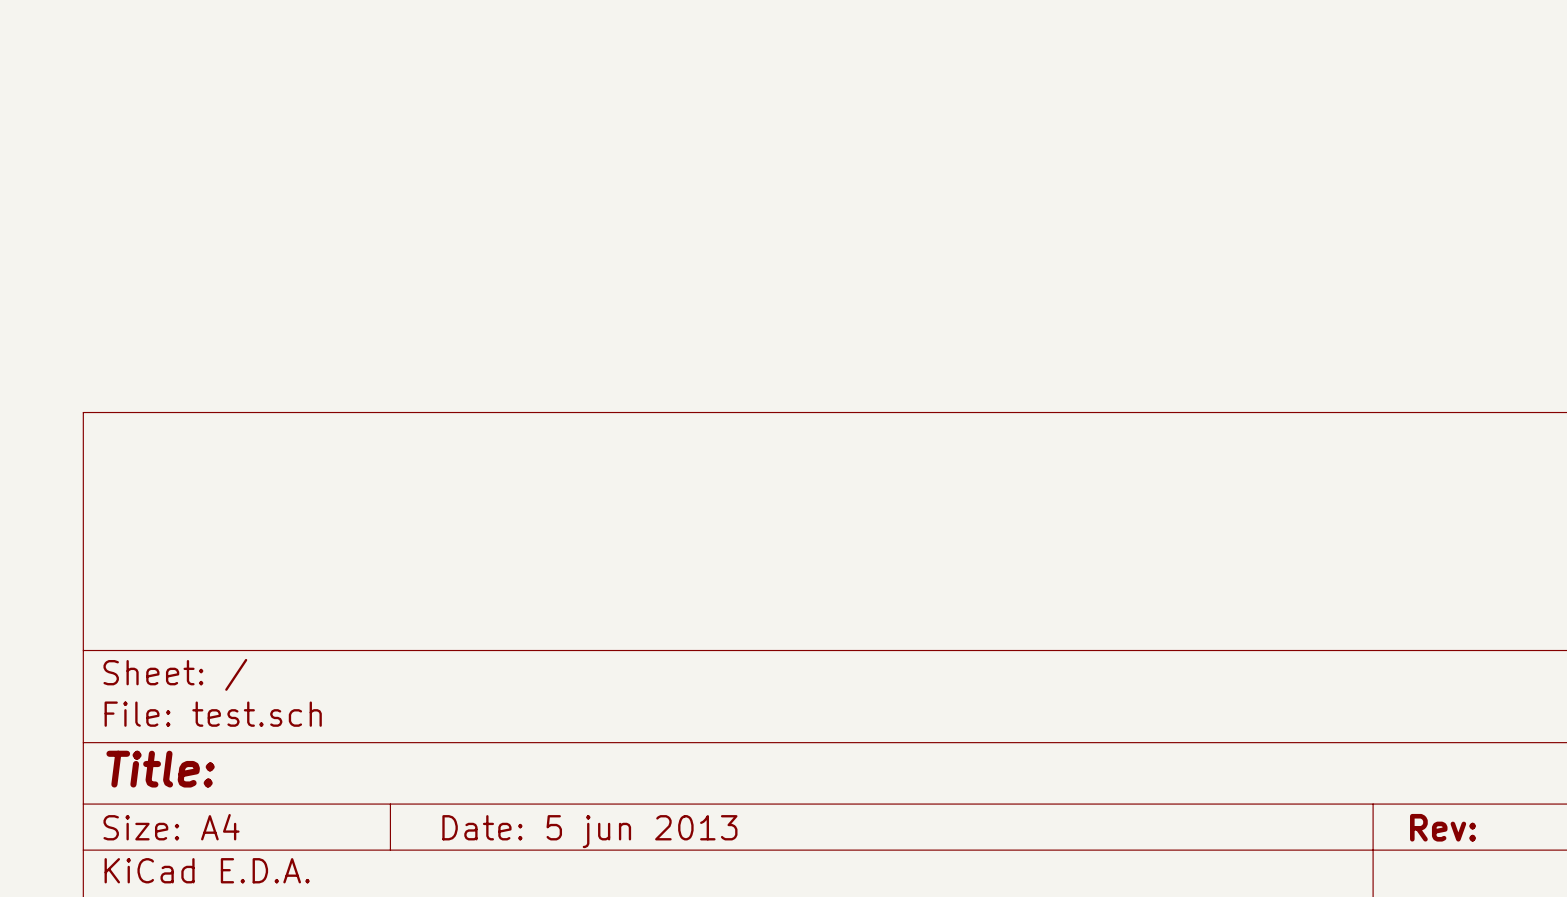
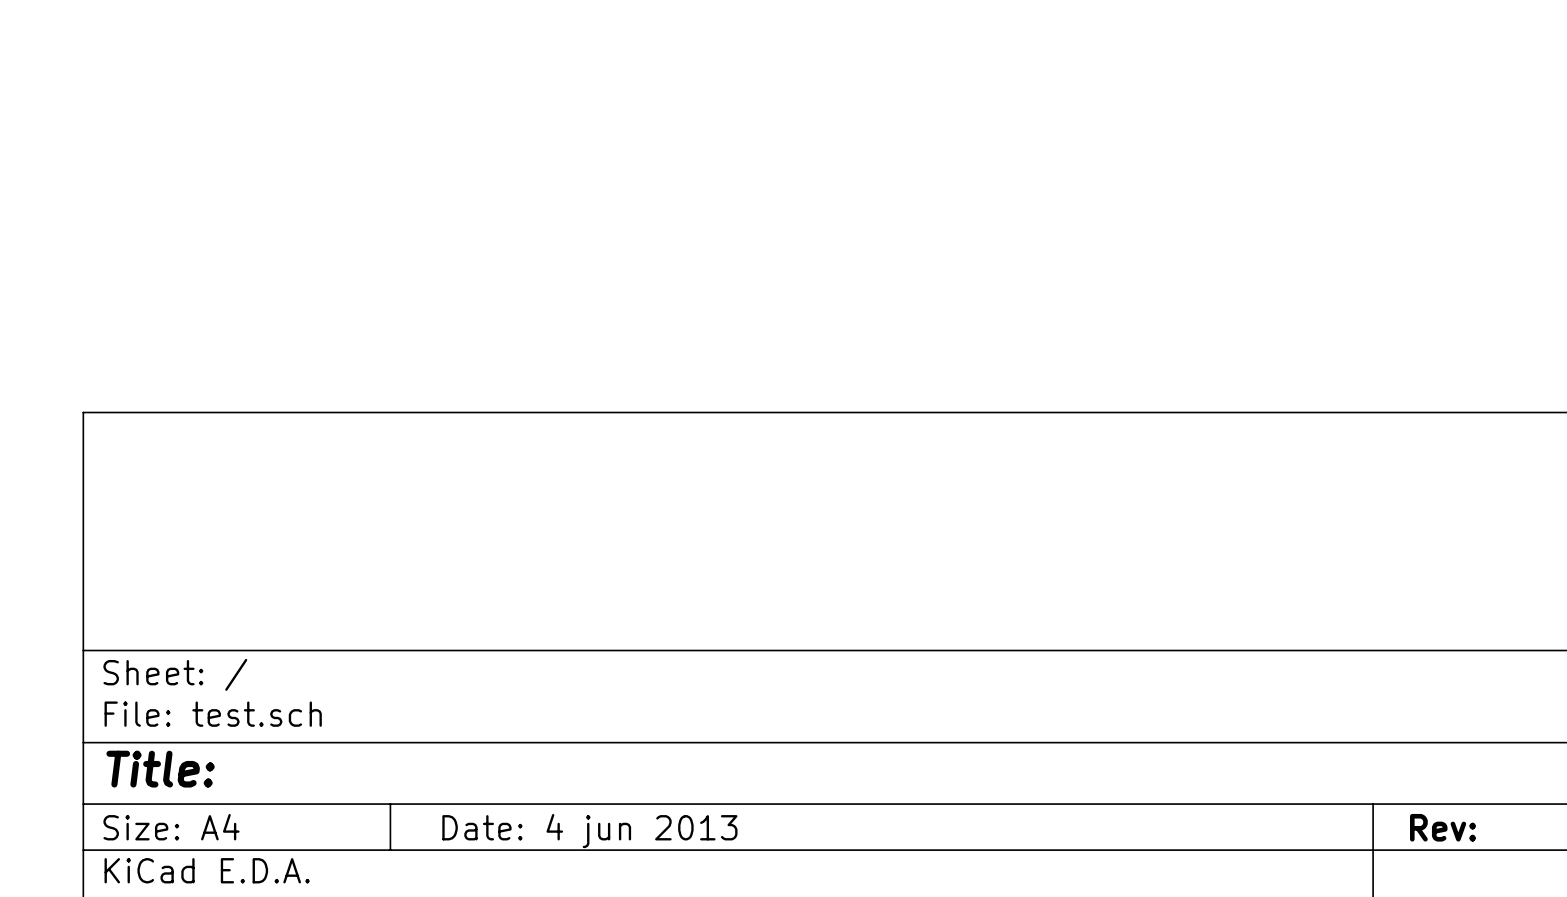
title block: Date: 5 jun 2013 (589, 831) -> Date: 4 jun 2013 (589, 831)

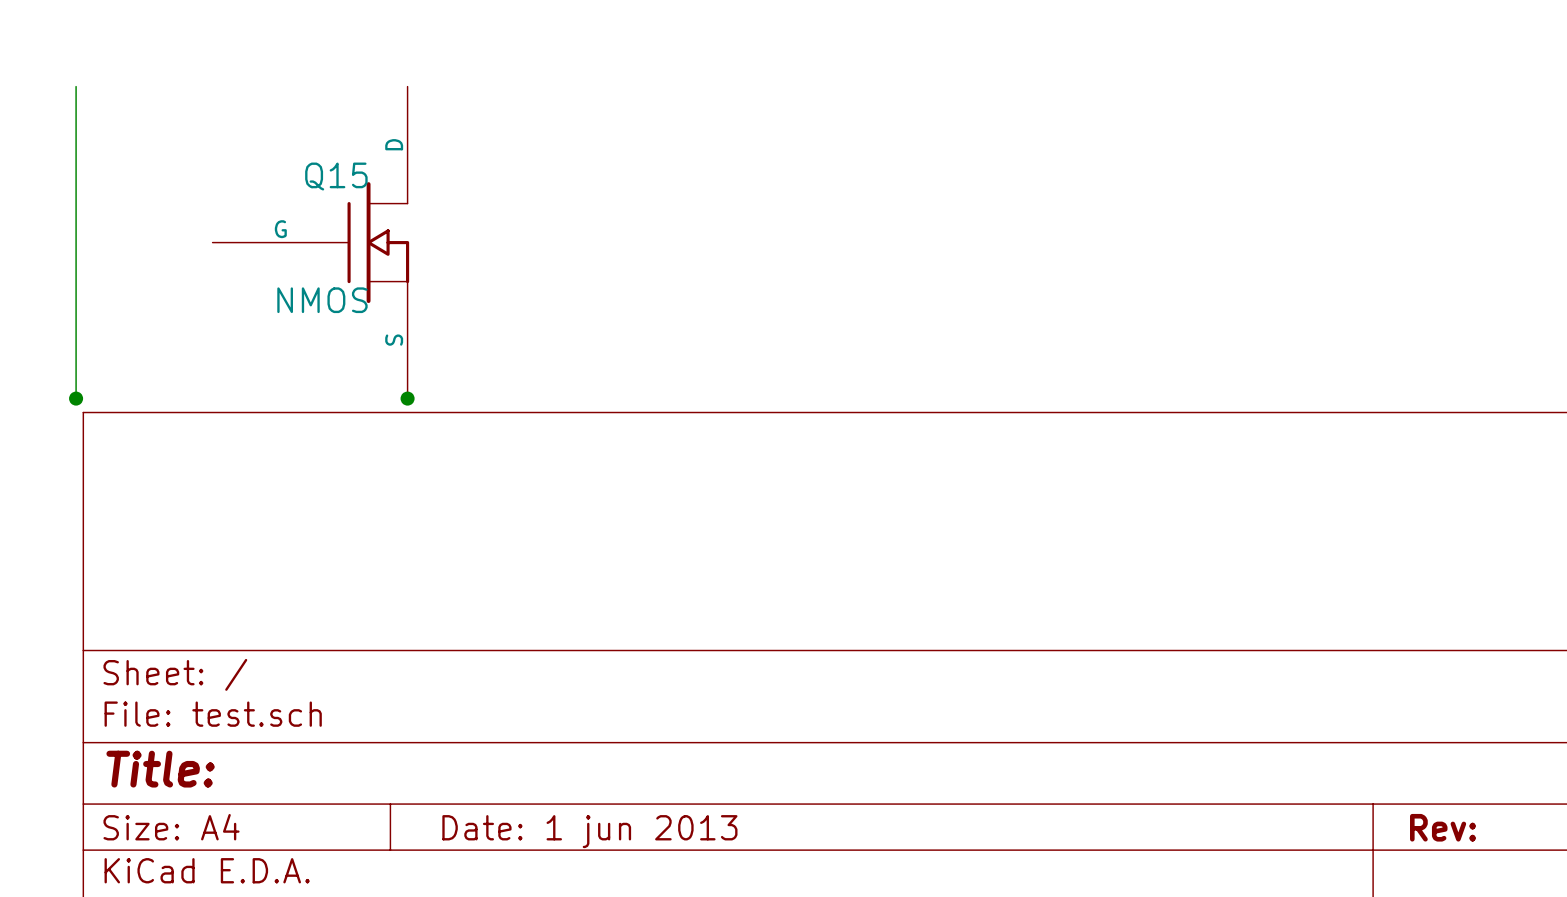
wire: none -> (76, 86) (76, 398)
Q15: none -> NMOS (310, 242)
junction: none -> (76, 398)
junction: none -> (407, 398)
title block: Date: 4 jun 2013 (589, 831) -> Date: 1 jun 2013 (589, 831)

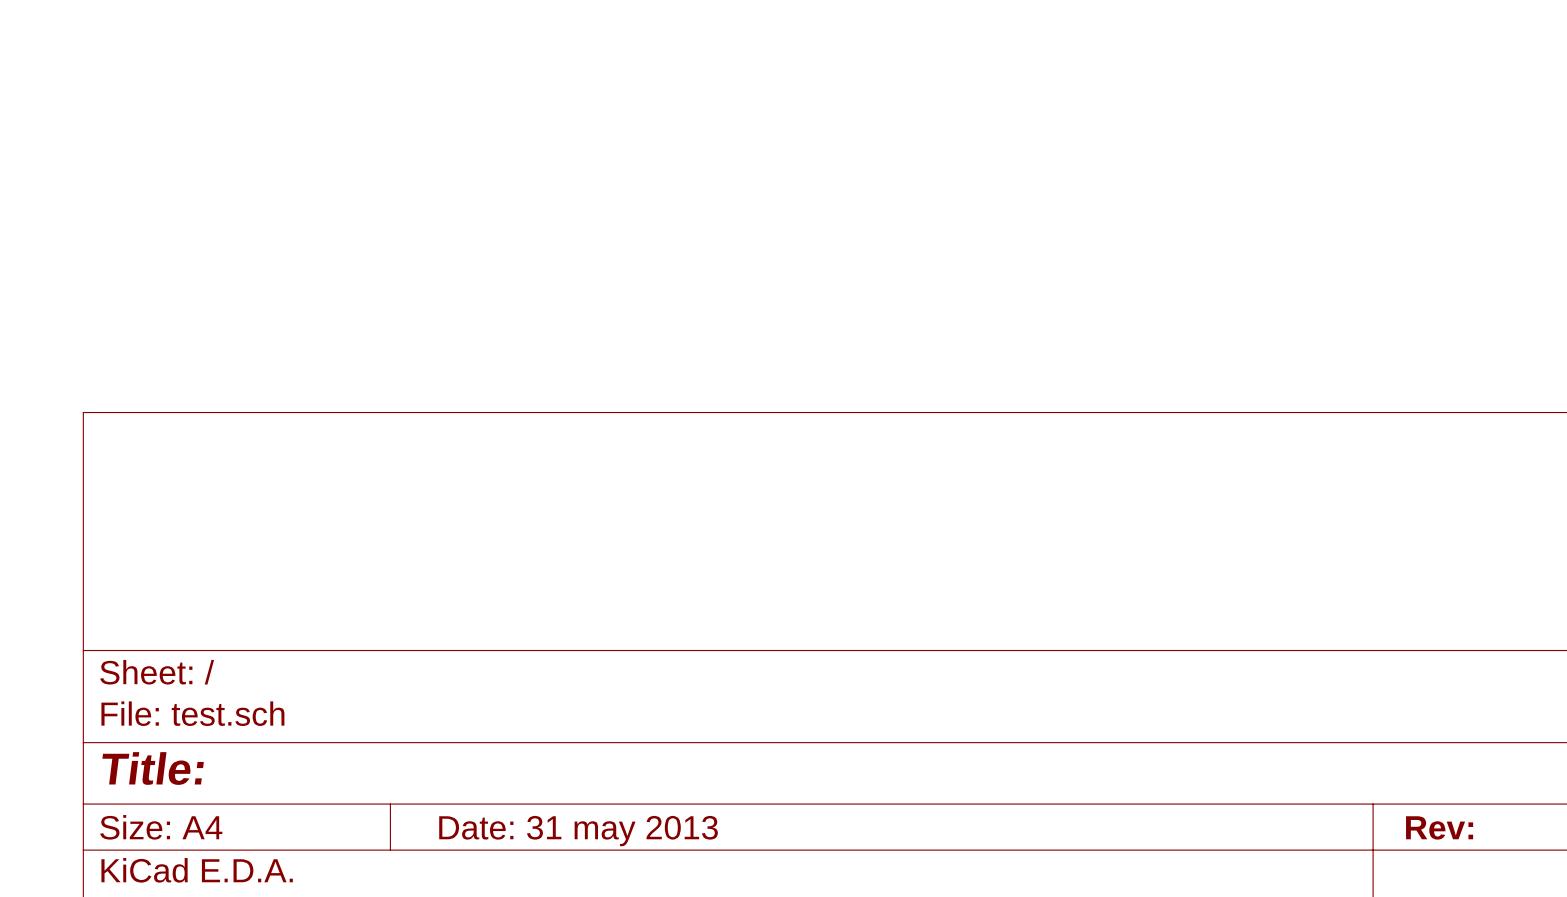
wire: (76, 86) (76, 398) -> none
Q15: NMOS (310, 242) -> none
junction: (76, 398) -> none
junction: (407, 398) -> none
title block: Date: 1 jun 2013 (589, 831) -> Date: 31 may 2013 (578, 831)

